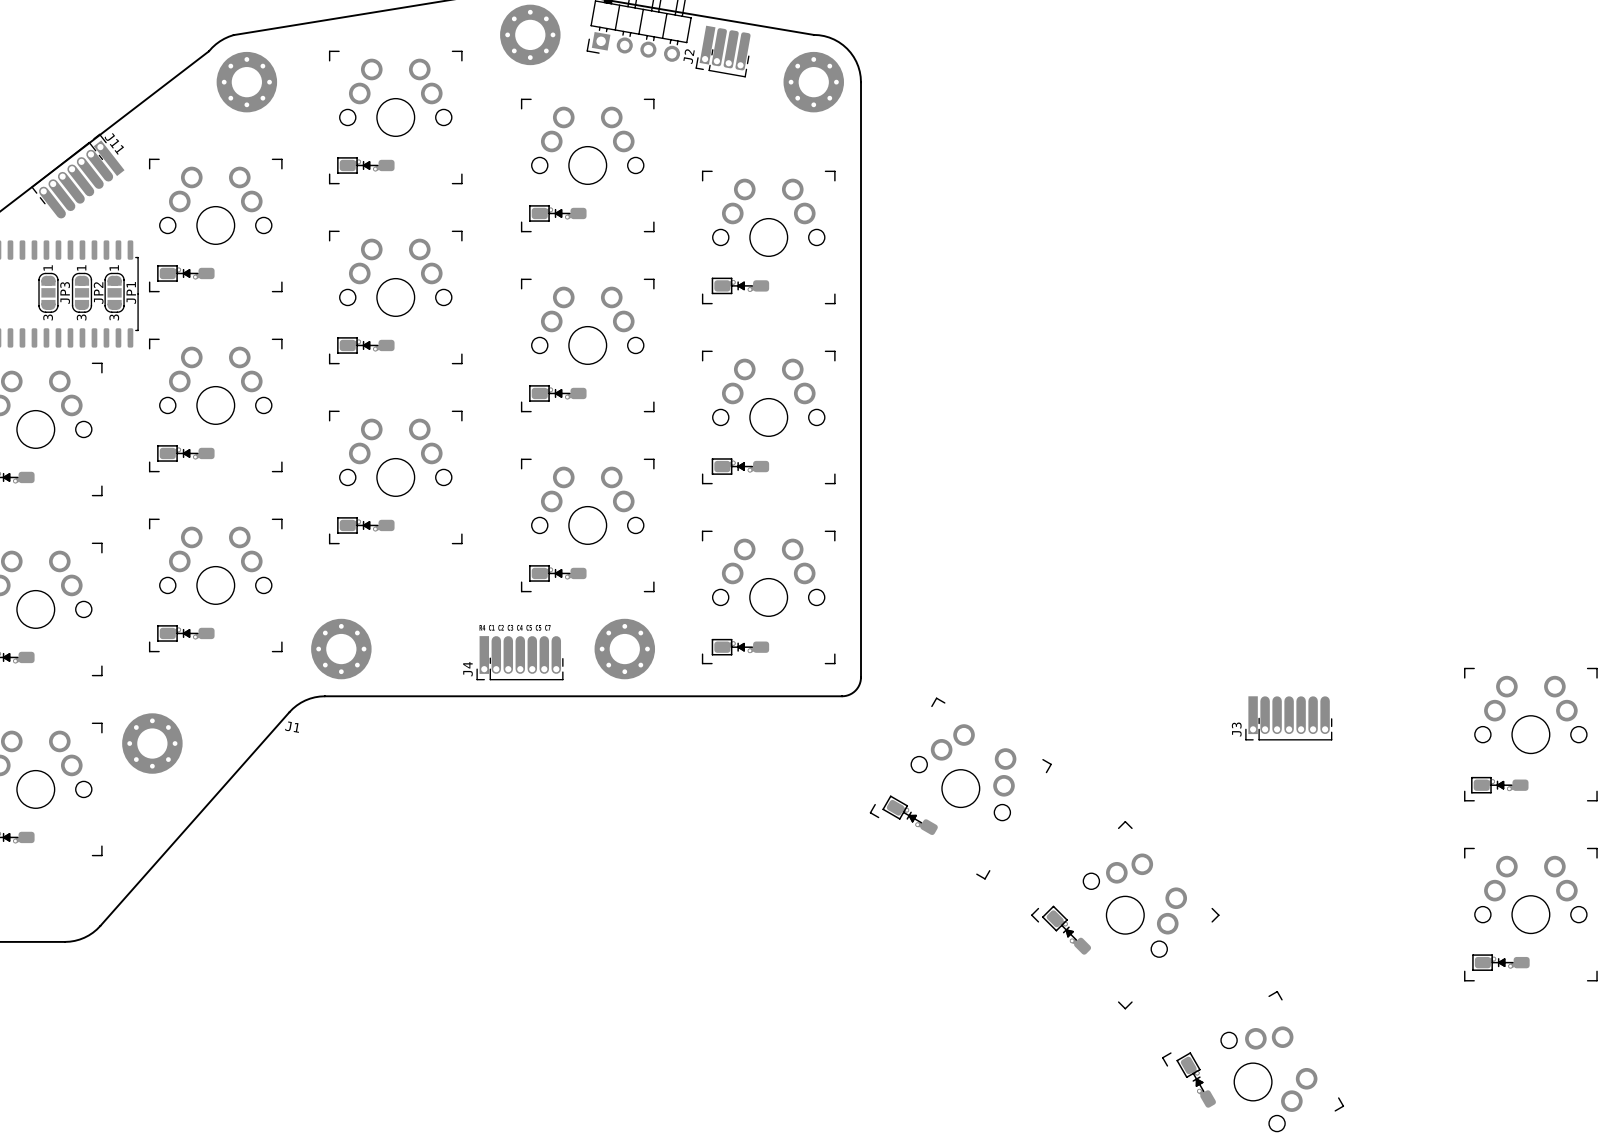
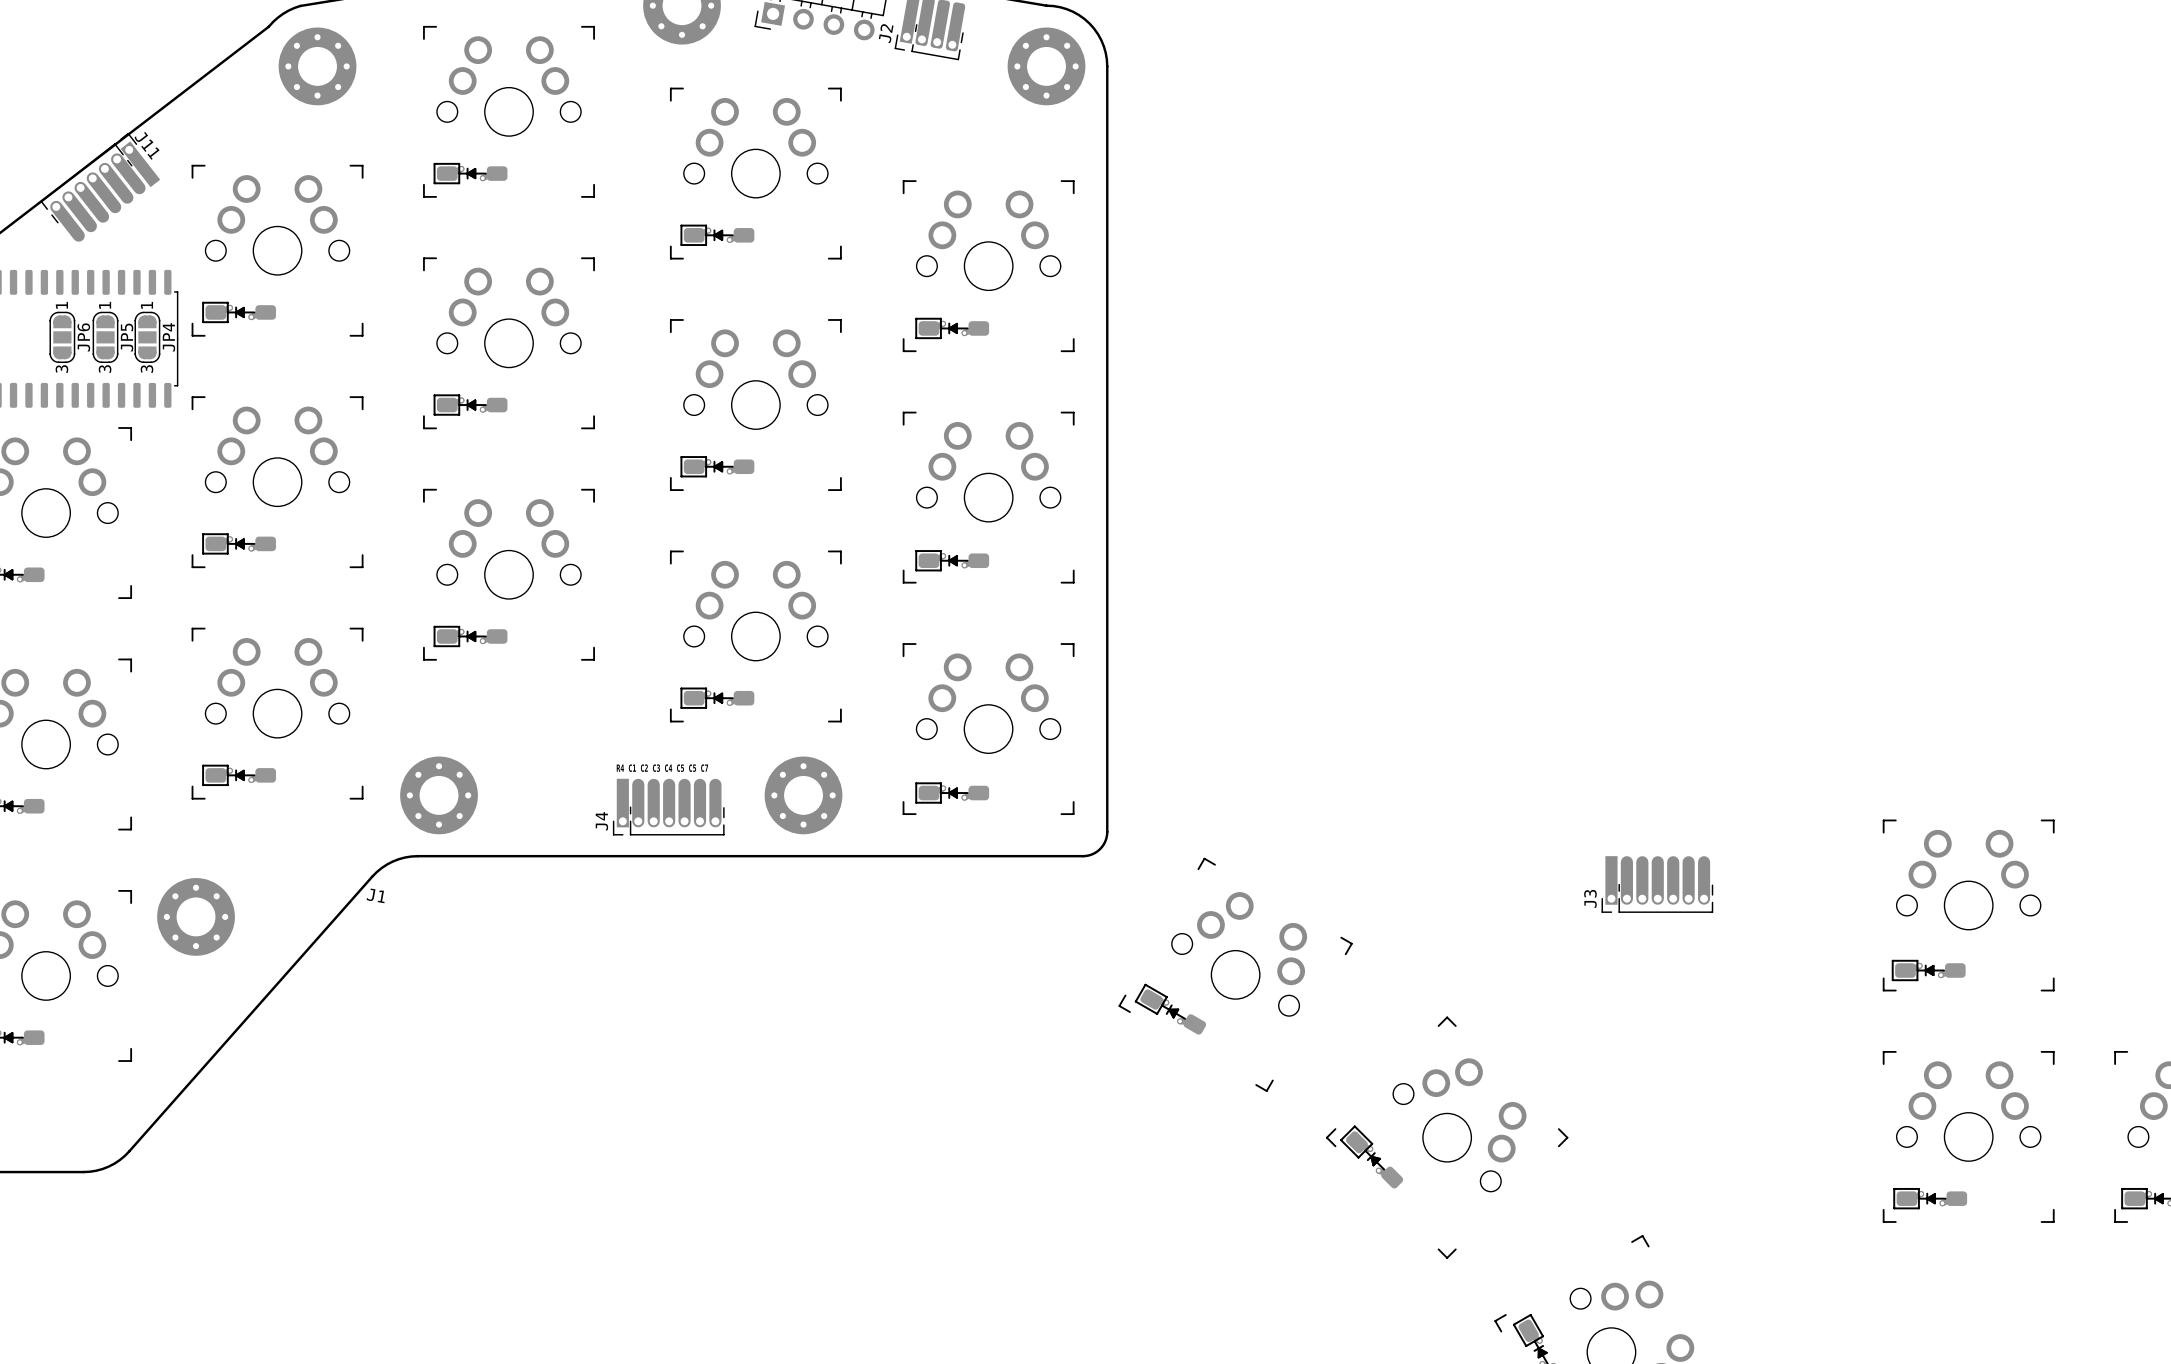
JP3 name: JP3 (65, 292) -> JP6 (83, 337)
JP1 name: JP1 (131, 292) -> JP4 (168, 337)
JP2 name: JP2 (98, 293) -> JP5 (127, 337)

